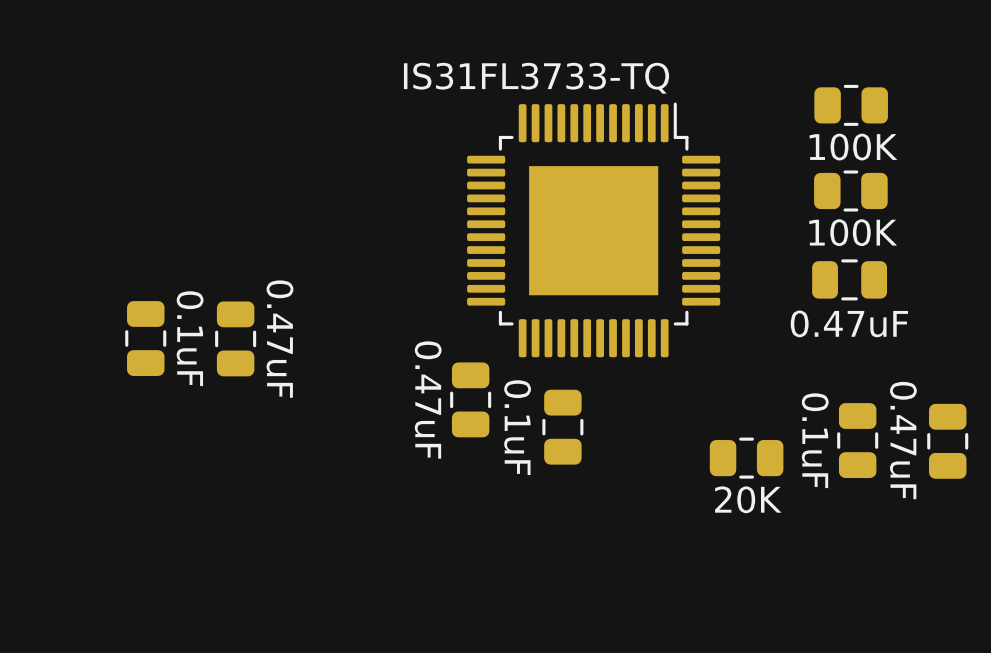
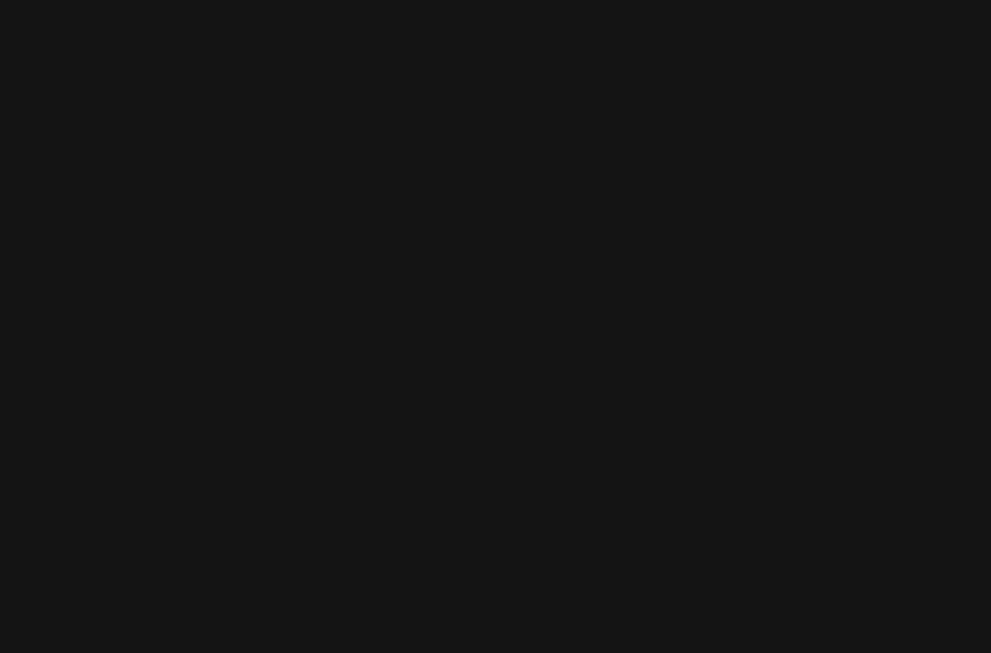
part: 100K (851, 105) -> none
part: 100K (850, 191) -> none
part: IS31FL3733-TQ (593, 229) -> none
part: 0.47uF (849, 279) -> none
part: 0.1uF (145, 338) -> none
part: 0.47uF (235, 338) -> none
part: 0.47uF (470, 399) -> none
part: 0.1uF (562, 427) -> none
part: 0.1uF (857, 440) -> none
part: 0.47uF (947, 441) -> none
part: 20K (746, 458) -> none

